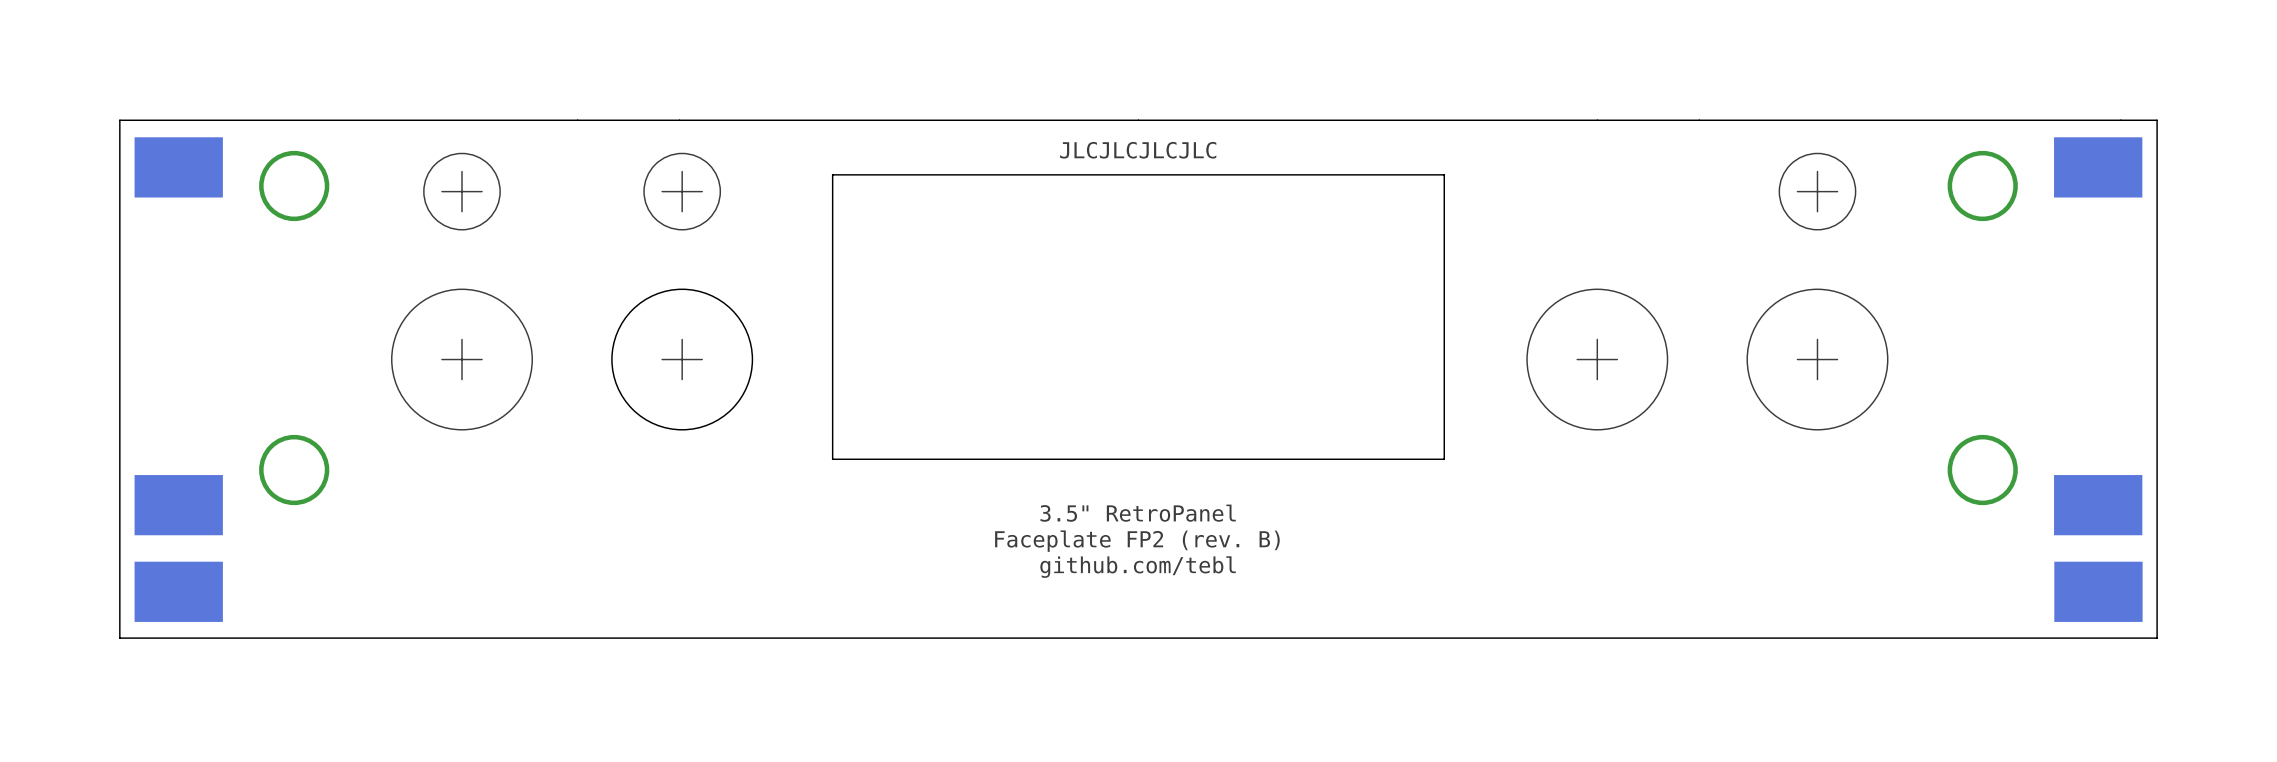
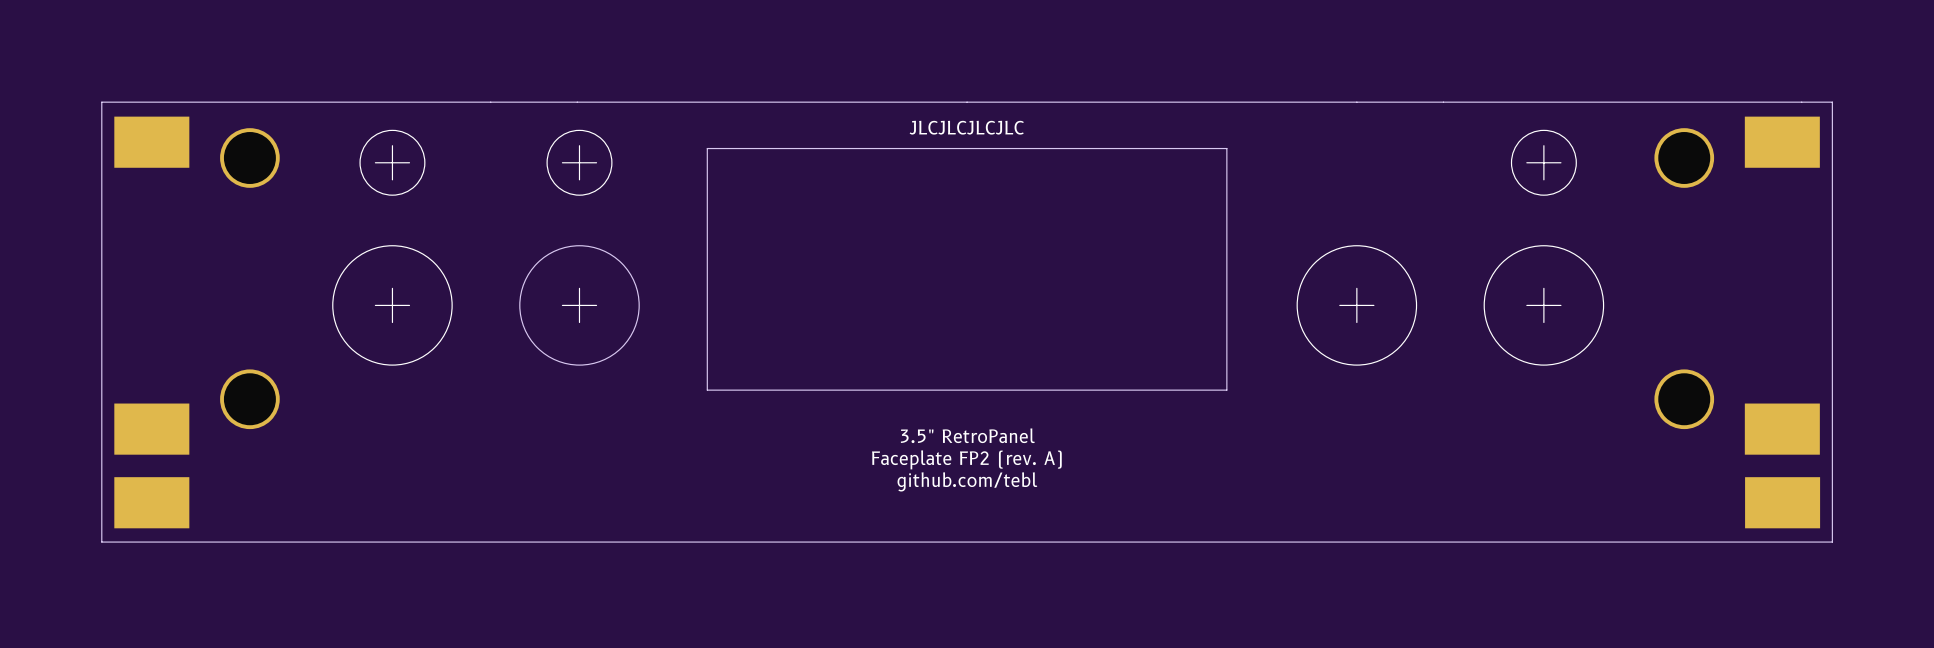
text: Faceplate FP2 (rev. B) (1137, 541) -> Faceplate FP2 (rev. A) (966, 459)

